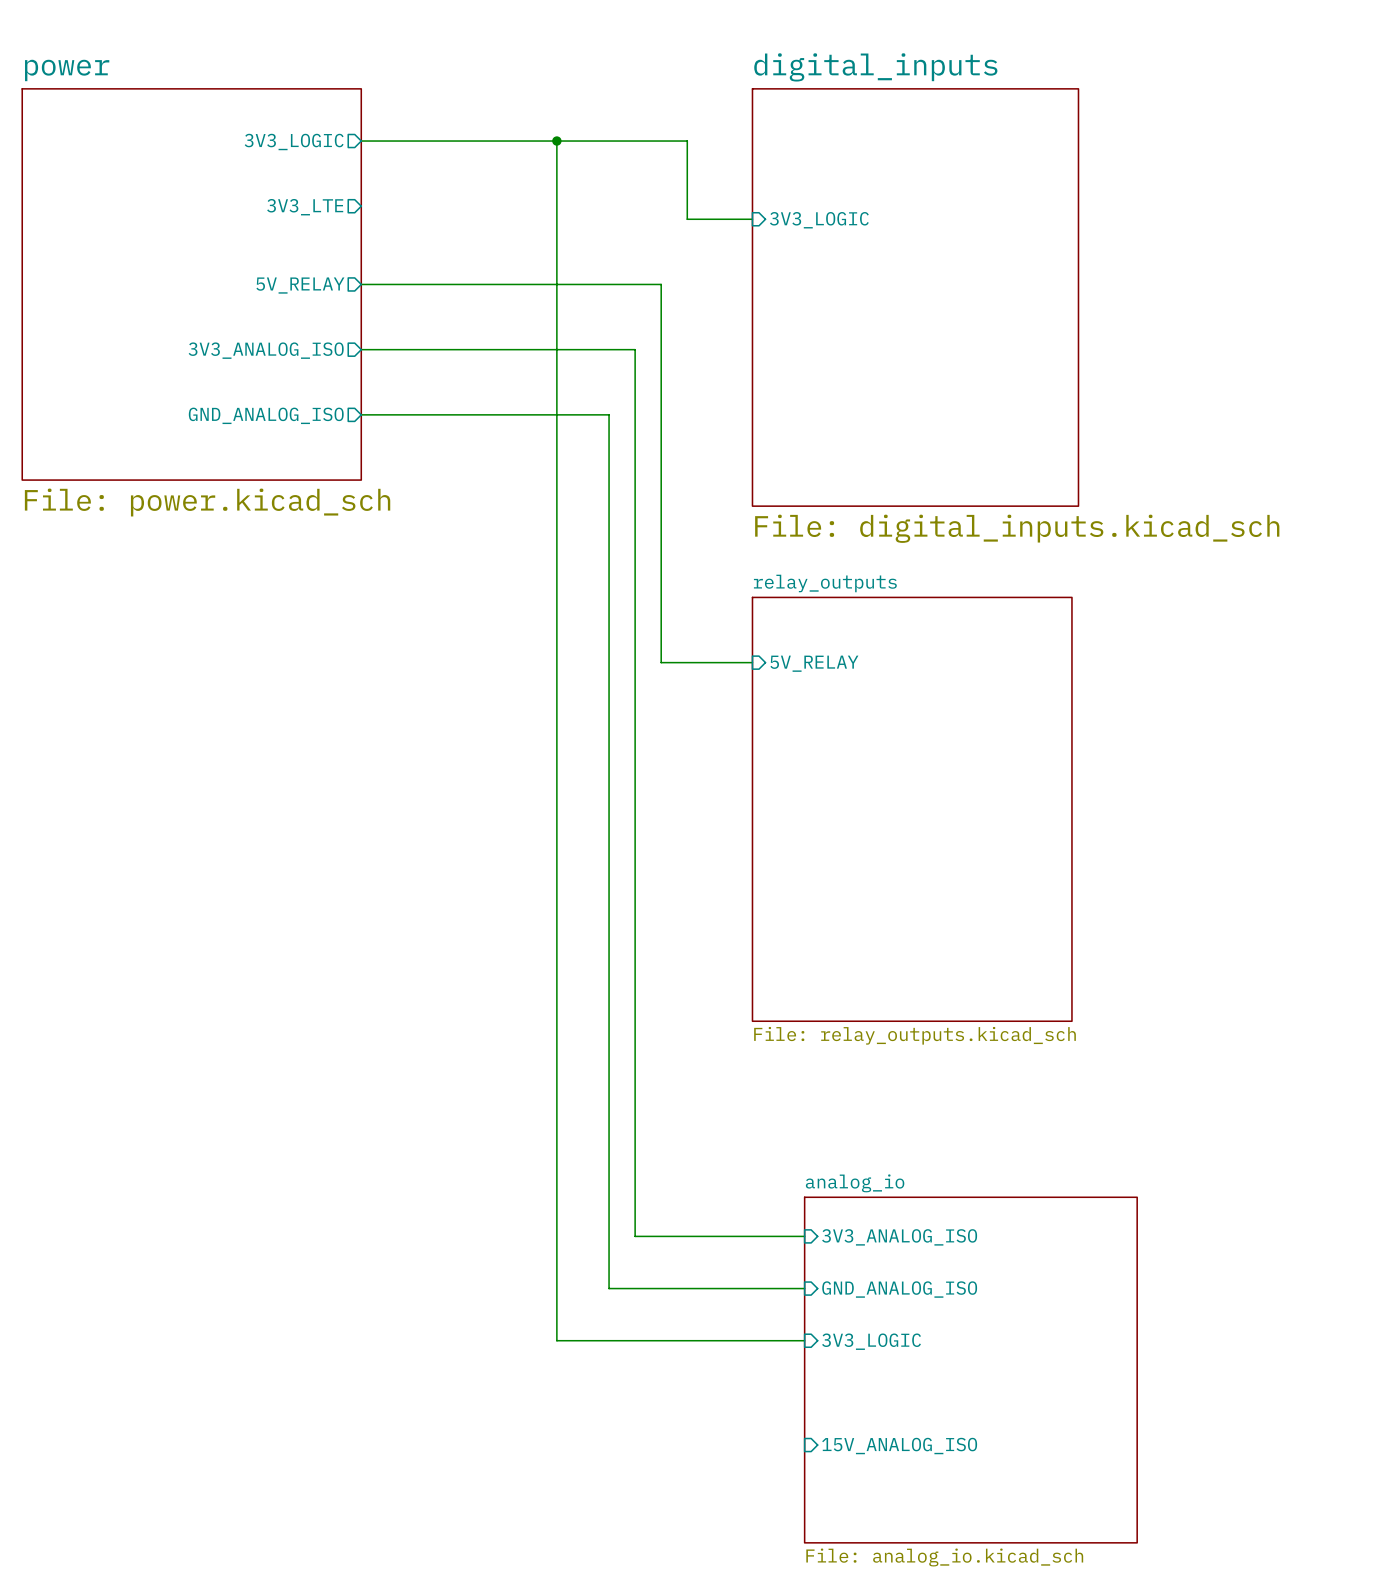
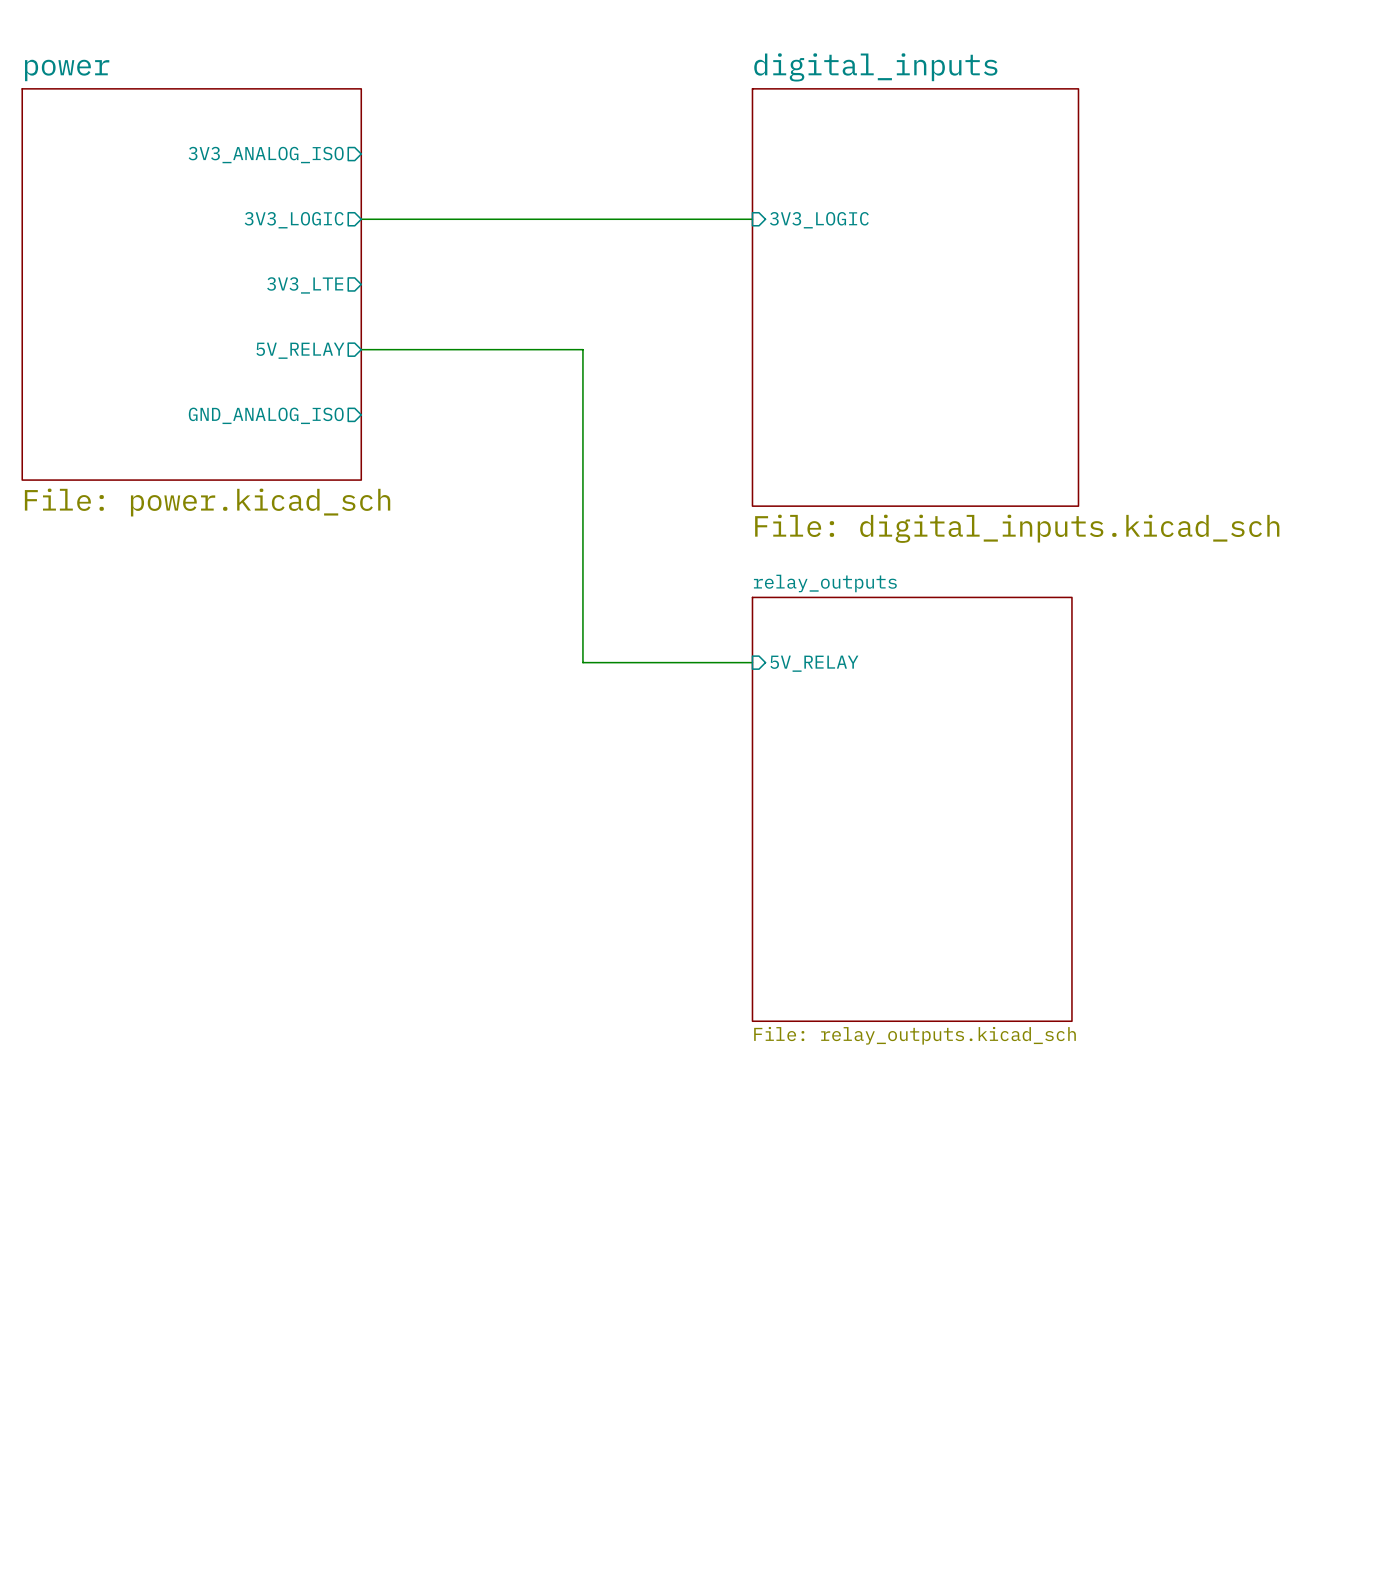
wire: (361, 141) (687, 141) (687, 219) -> (361, 219) (687, 219)
wire: (556, 141) (556, 1340) (804, 1340) -> none
junction: (556, 141) -> none
sheet pin position: 3V3_LOGIC (294, 142) -> 3V3_LOGIC (294, 220)
sheet pin: none -> 3V3_ANALOG_ISO (266, 155)
sheet pin: 3V3_LTE (305, 207) -> none
wire: (361, 284) (661, 284) (661, 662) -> (582, 349) (582, 662) (661, 662)
sheet pin: 5V_RELAY (300, 285) -> 3V3_LTE (305, 285)
wire: (582, 349) (635, 349) (635, 1236) (804, 1236) -> none
sheet pin: 3V3_ANALOG_ISO (266, 350) -> 5V_RELAY (300, 350)
wire: (361, 414) (609, 414) (609, 1288) (804, 1288) -> none
sheet pin: 3V3_ANALOG_ISO (899, 1237) -> none
sheet pin: GND_ANALOG_ISO (899, 1289) -> none
sheet pin: 3V3_LOGIC (871, 1341) -> none
sheet analog_io: File: analog_io.kicad_sch (970, 1370) -> none
sheet pin: 15V_ANALOG_ISO (899, 1446) -> none

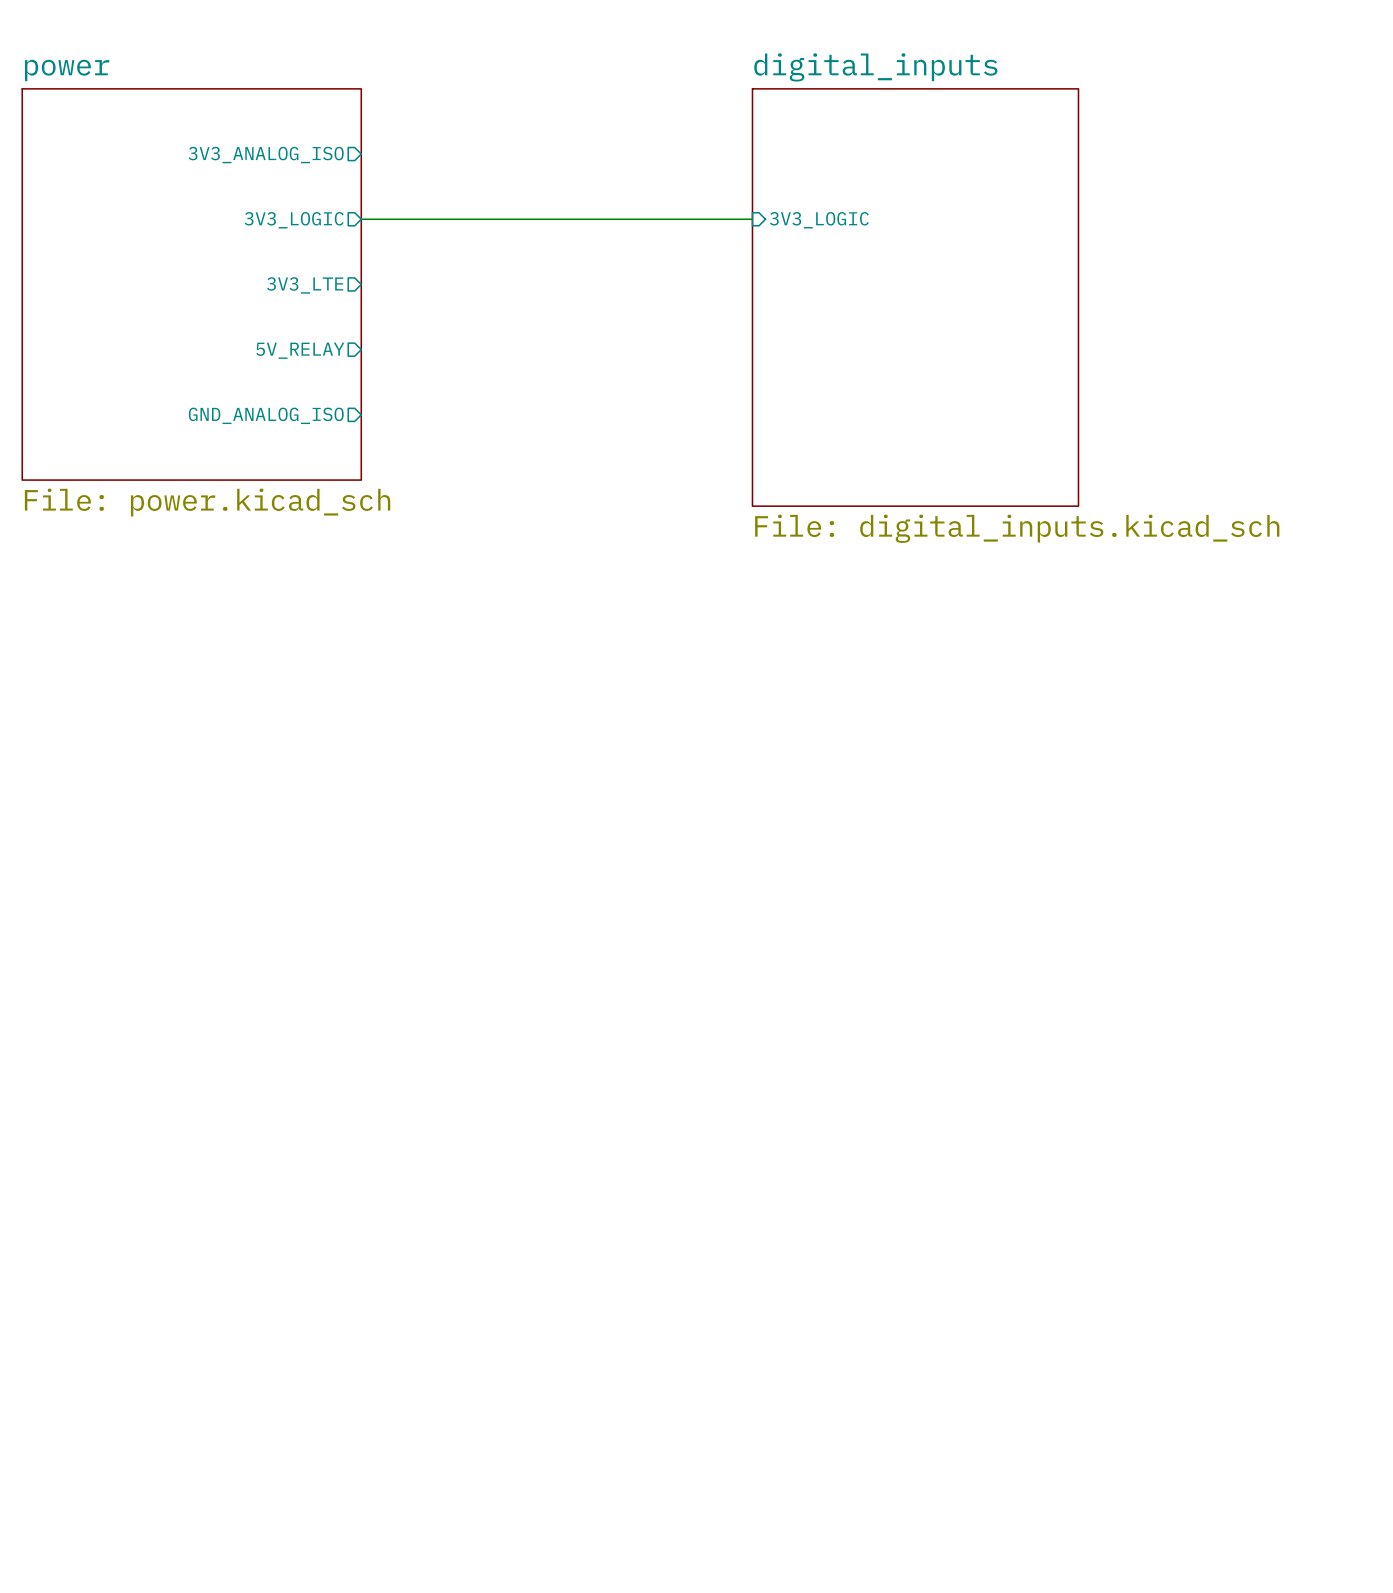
wire: (361, 349) (582, 349) (582, 662) (752, 662) -> none
sheet pin: 5V_RELAY (814, 663) -> none
sheet relay_outputs: File: relay_outputs.kicad_sch (912, 809) -> none

